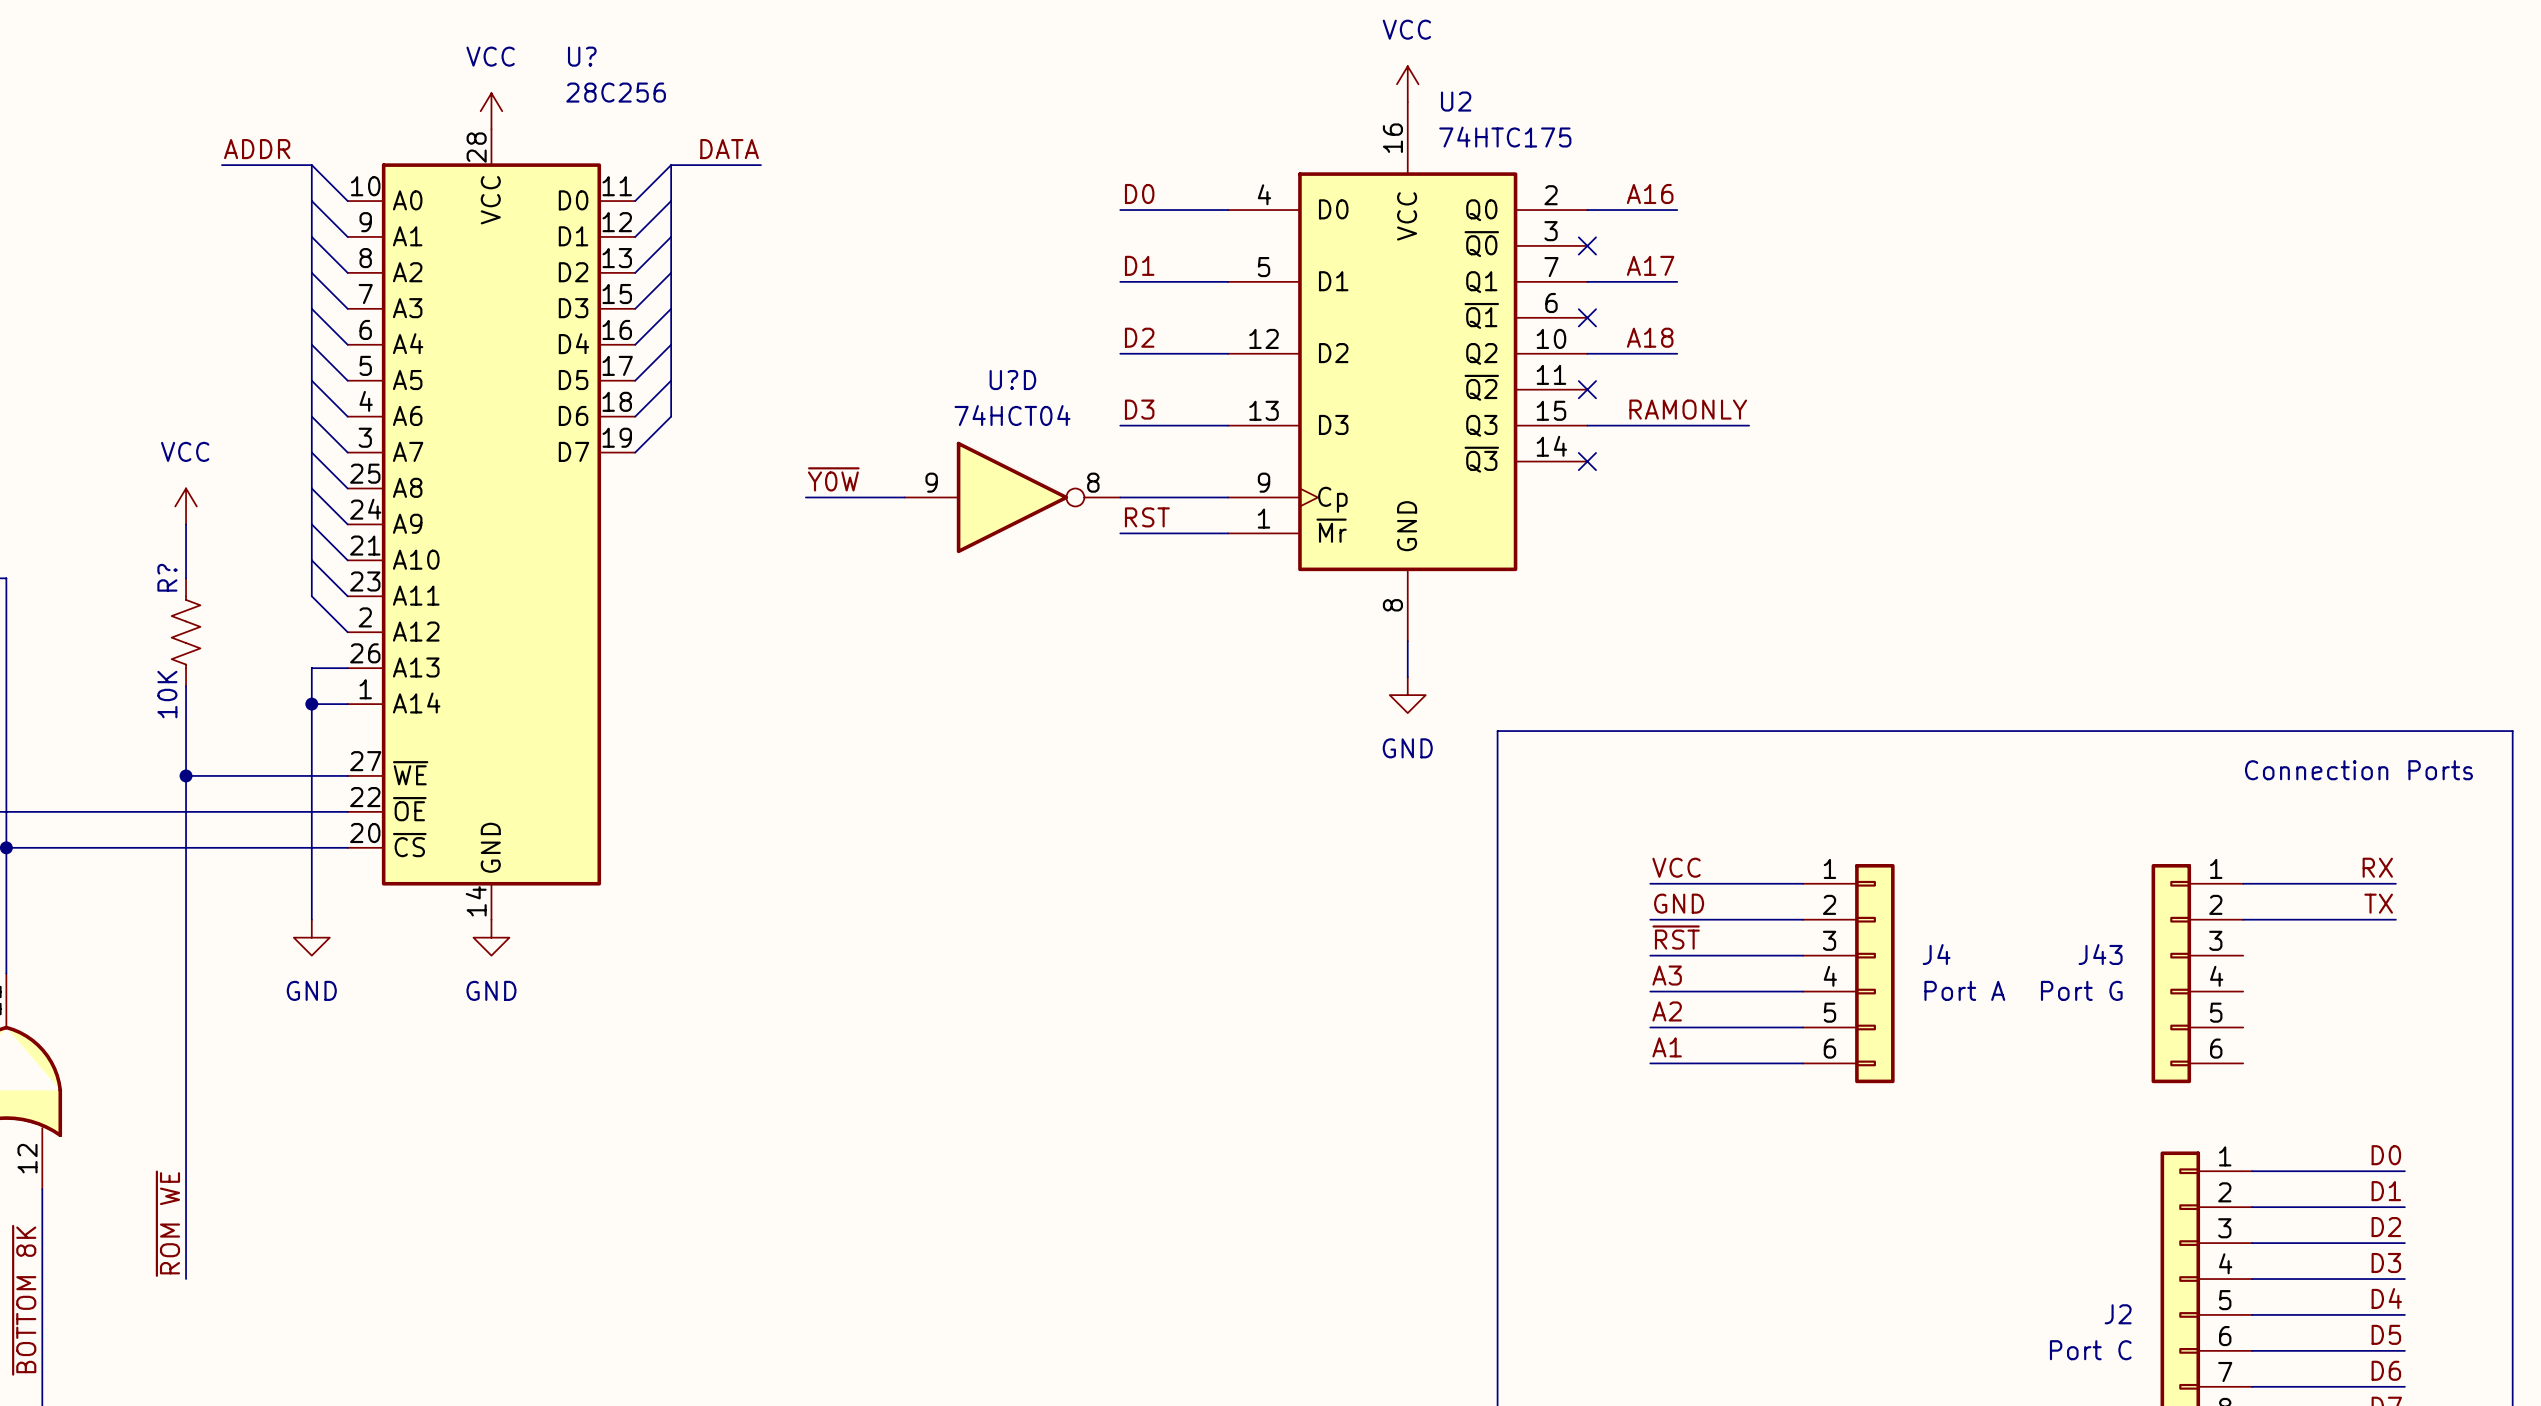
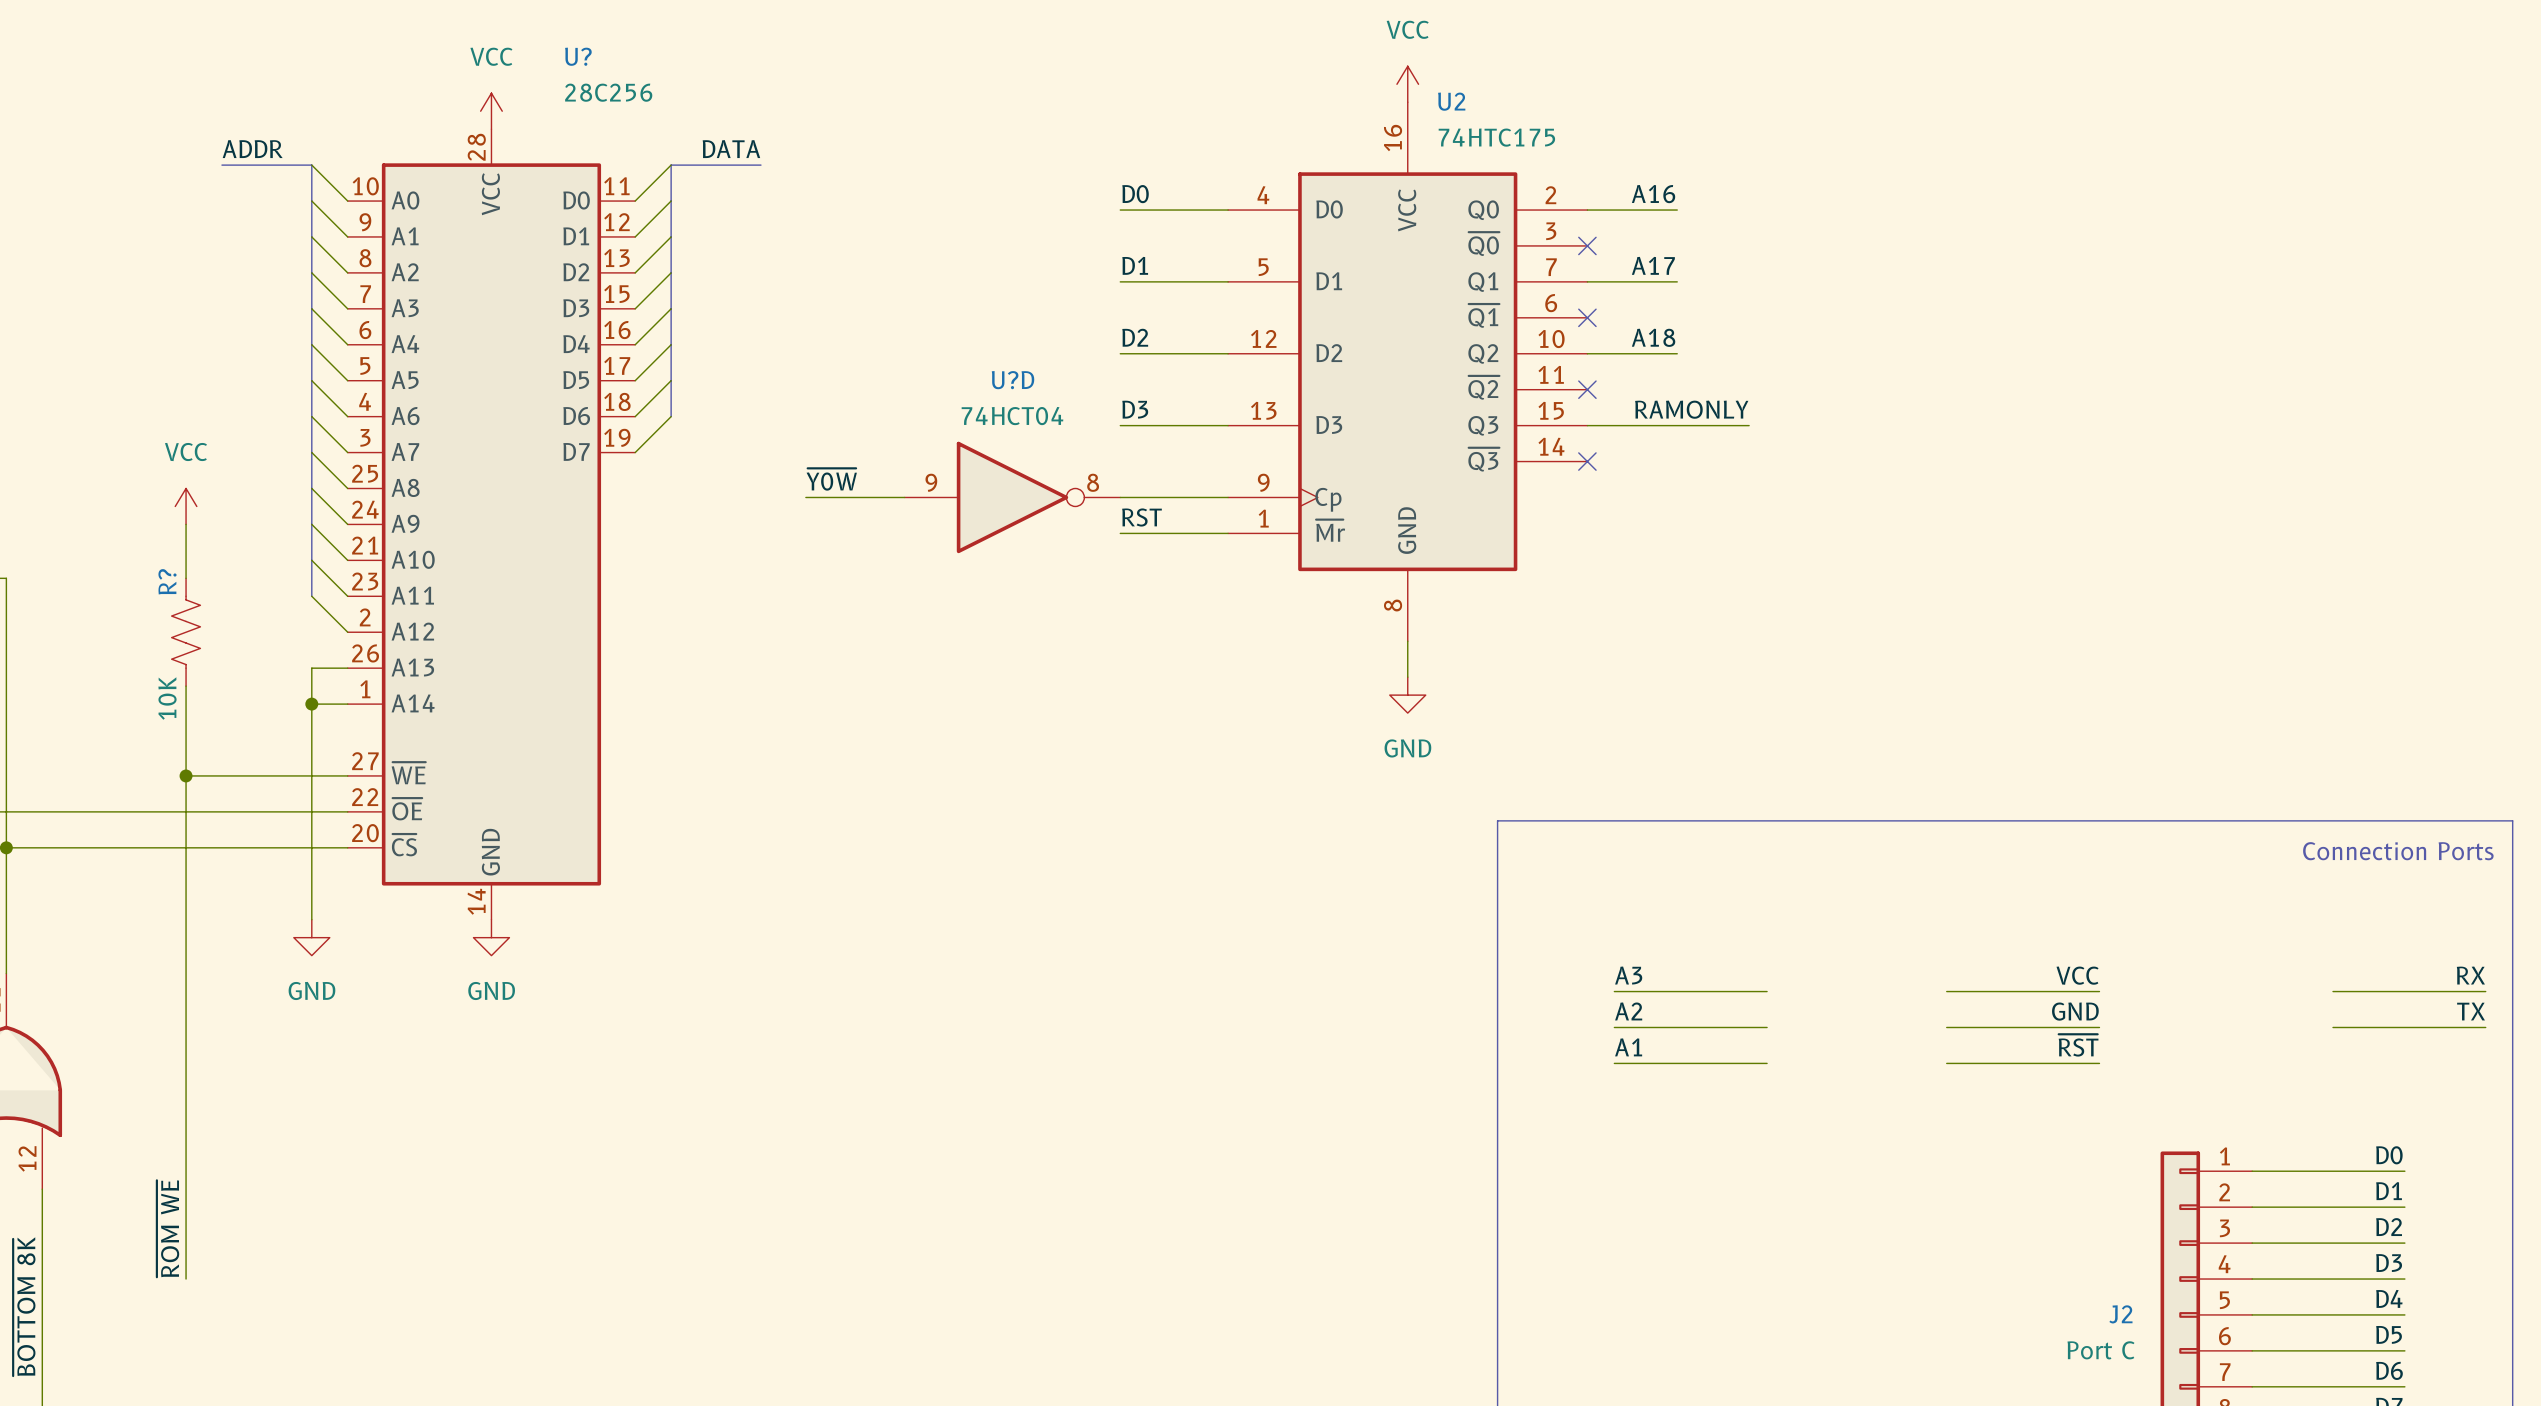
text position: Connection Ports (2358, 770) -> Connection Ports (2398, 851)
line: (1497, 820) (1497, 731) (2512, 731) (2512, 820) -> (1497, 820) (2512, 820)
label: VCC (1676, 867) -> none
label position: RX (2377, 867) -> RX (2470, 975)
wire: (1650, 883) (1803, 883) -> (1946, 991) (2099, 991)
wire: (2243, 883) (2395, 883) -> (2333, 991) (2485, 991)
label: GND (1679, 903) -> none
label position: TX (2378, 903) -> TX (2471, 1011)
wire: (1650, 919) (1803, 919) -> (1946, 1027) (2099, 1027)
wire: (2243, 919) (2395, 919) -> (2333, 1027) (2485, 1027)
label: ~{RST} (1676, 937) -> none
wire: (1650, 955) (1803, 955) -> (1946, 1063) (2099, 1063)
J4: Port A (1848, 973) -> none
J43: Port G (2197, 973) -> none
label position: A3 (1667, 975) -> A3 (1628, 975)
label: none -> VCC (2077, 975)
wire: (1767, 991) (1803, 991) -> (1614, 991) (1650, 991)
label position: A2 (1667, 1011) -> A2 (1628, 1011)
label: none -> GND (2075, 1011)
wire: (1767, 1027) (1803, 1027) -> (1614, 1027) (1650, 1027)
label: none -> ~{RST} (2078, 1045)
label position: A1 (1667, 1047) -> A1 (1628, 1047)
wire: (1767, 1063) (1803, 1063) -> (1614, 1063) (1650, 1063)

